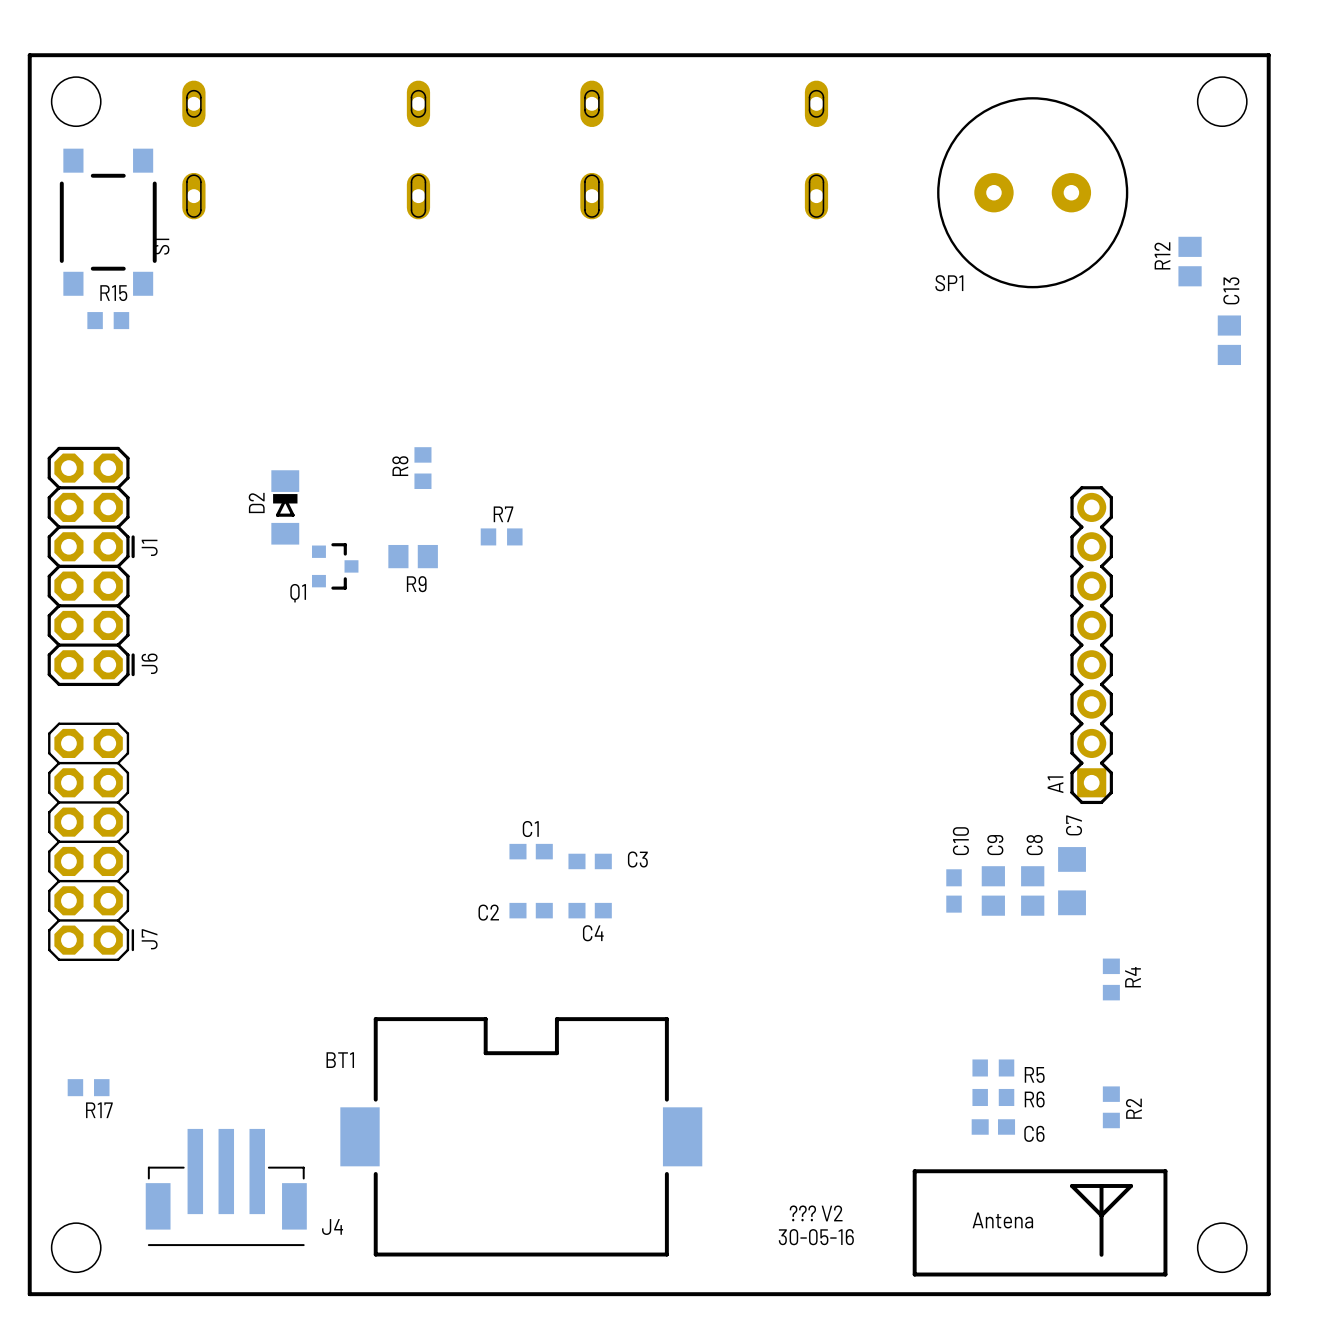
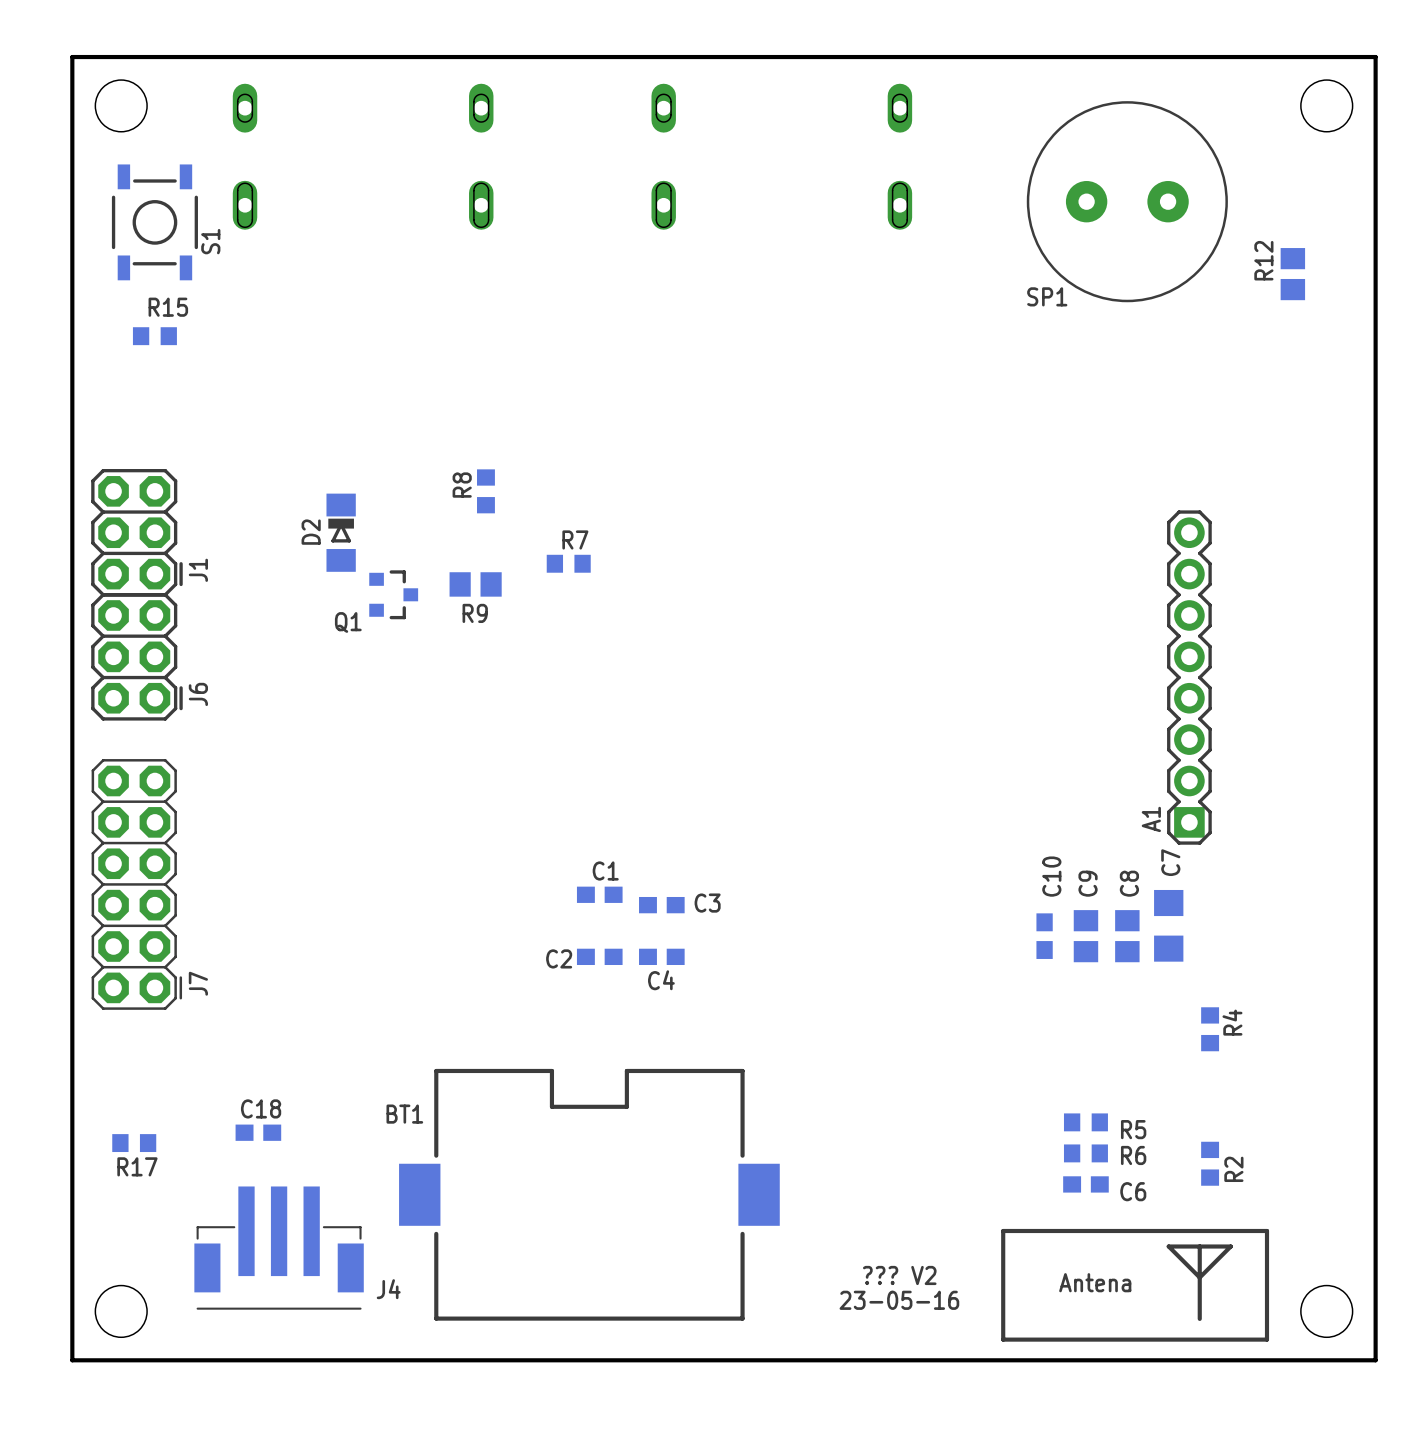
S1 footprint: [59, 148, 157, 296] -> [111, 164, 198, 281]
C13: (1229, 340) -> none
C18: none -> (258, 1132)
text: 30-05-16 (816, 1237) -> 23-05-16 (899, 1300)

